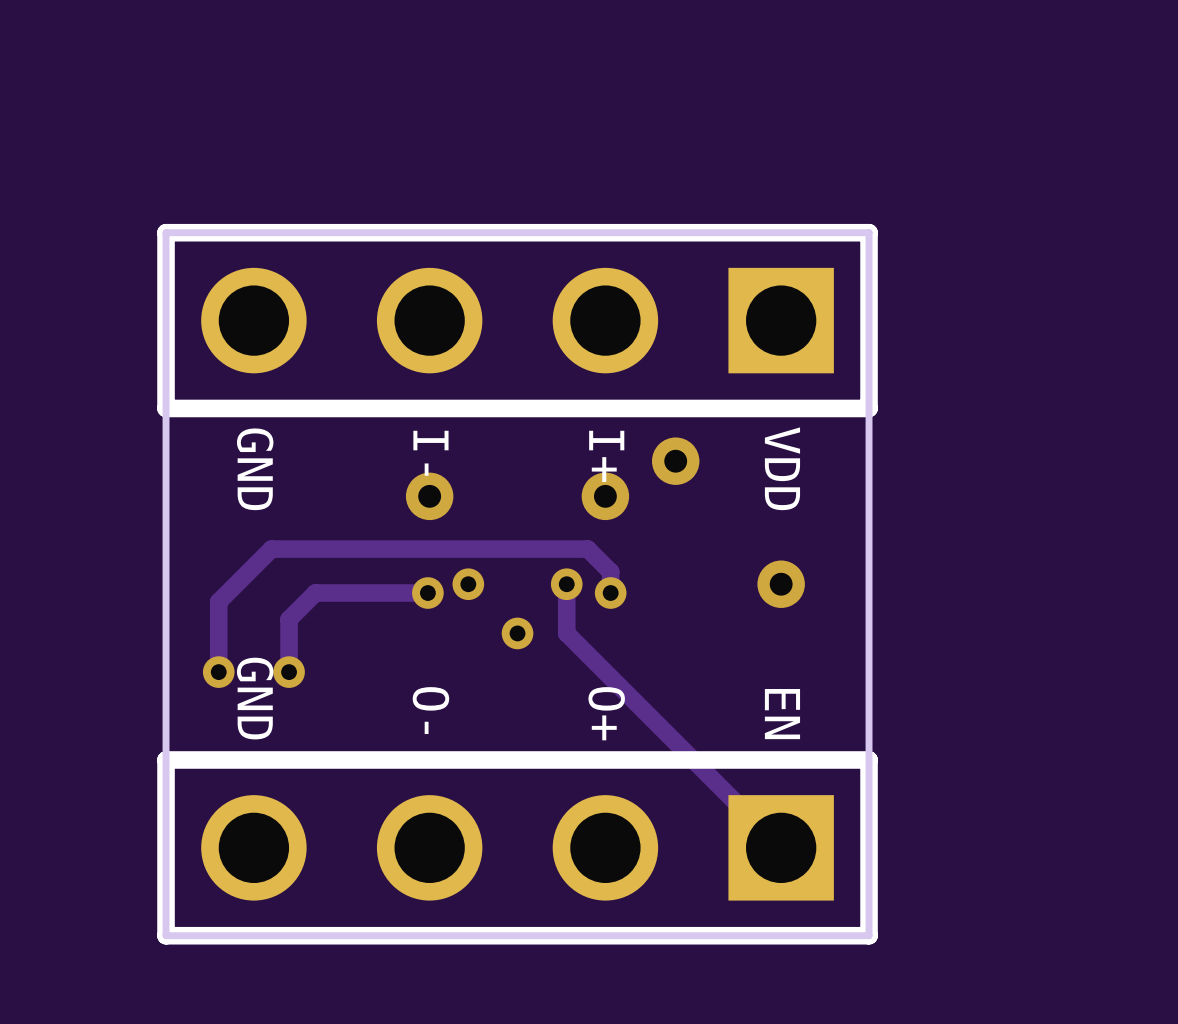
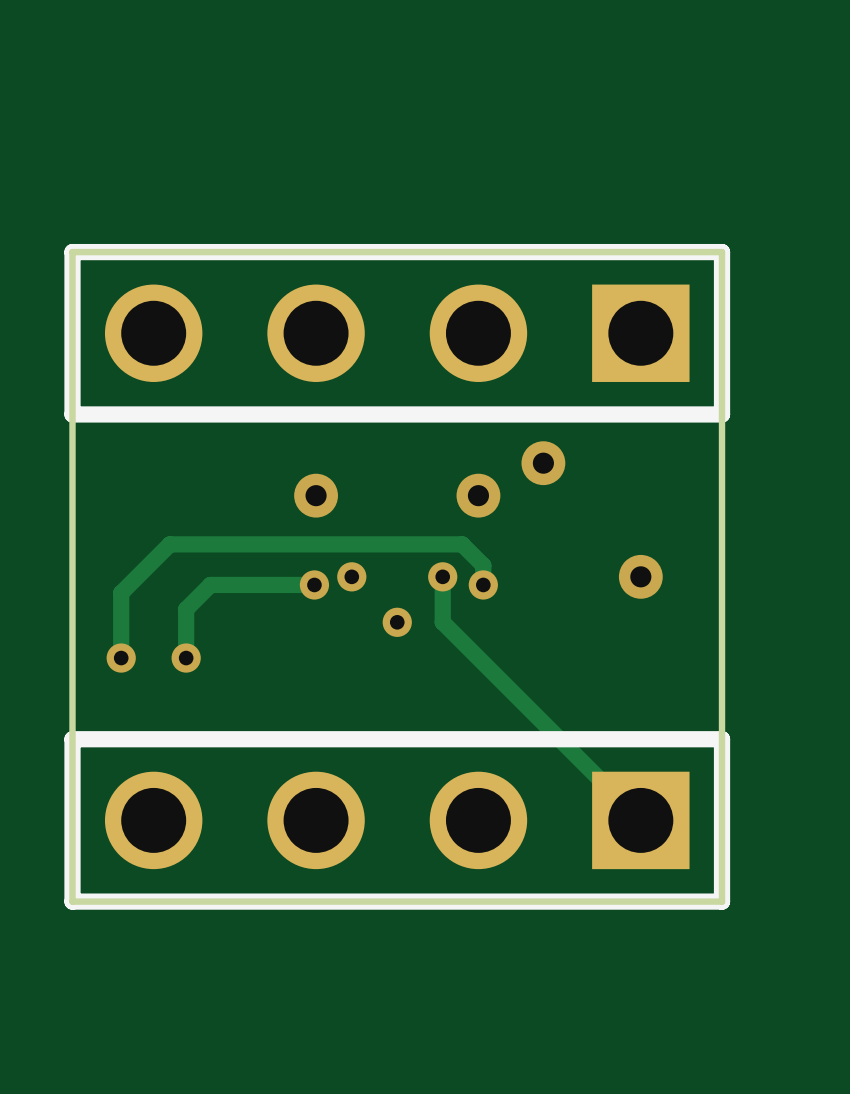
text: I- (430, 453) -> none
text: I+ (606, 456) -> none
text: VDD (782, 468) -> none
text: GND (255, 469) -> none
text: GND (255, 698) -> none
text: O- (430, 710) -> none
text: O+ (606, 713) -> none
text: EN (782, 714) -> none

